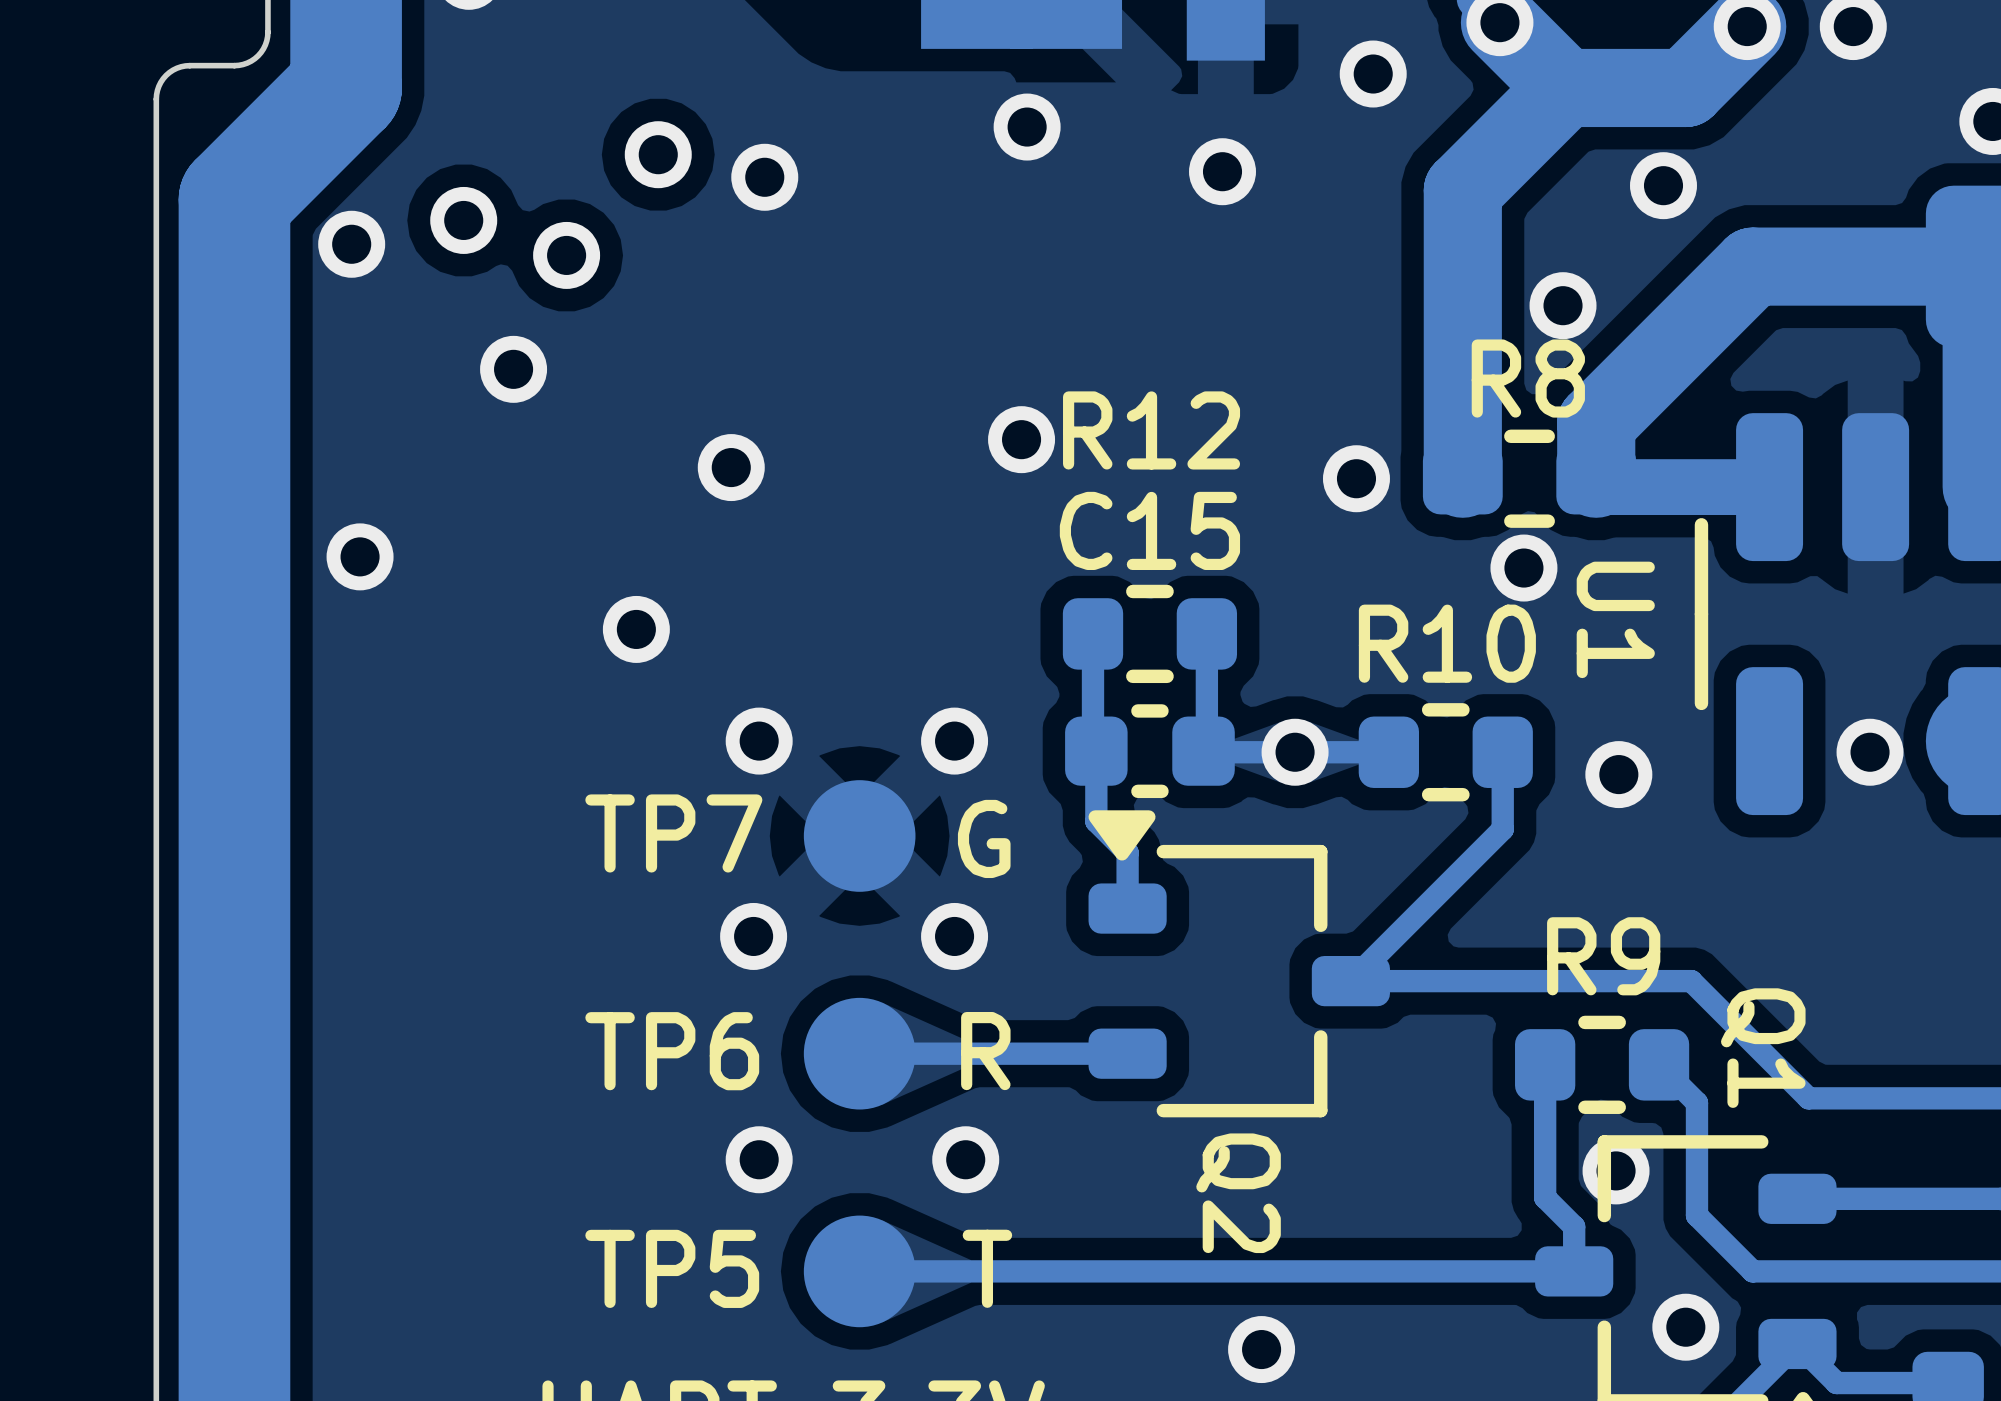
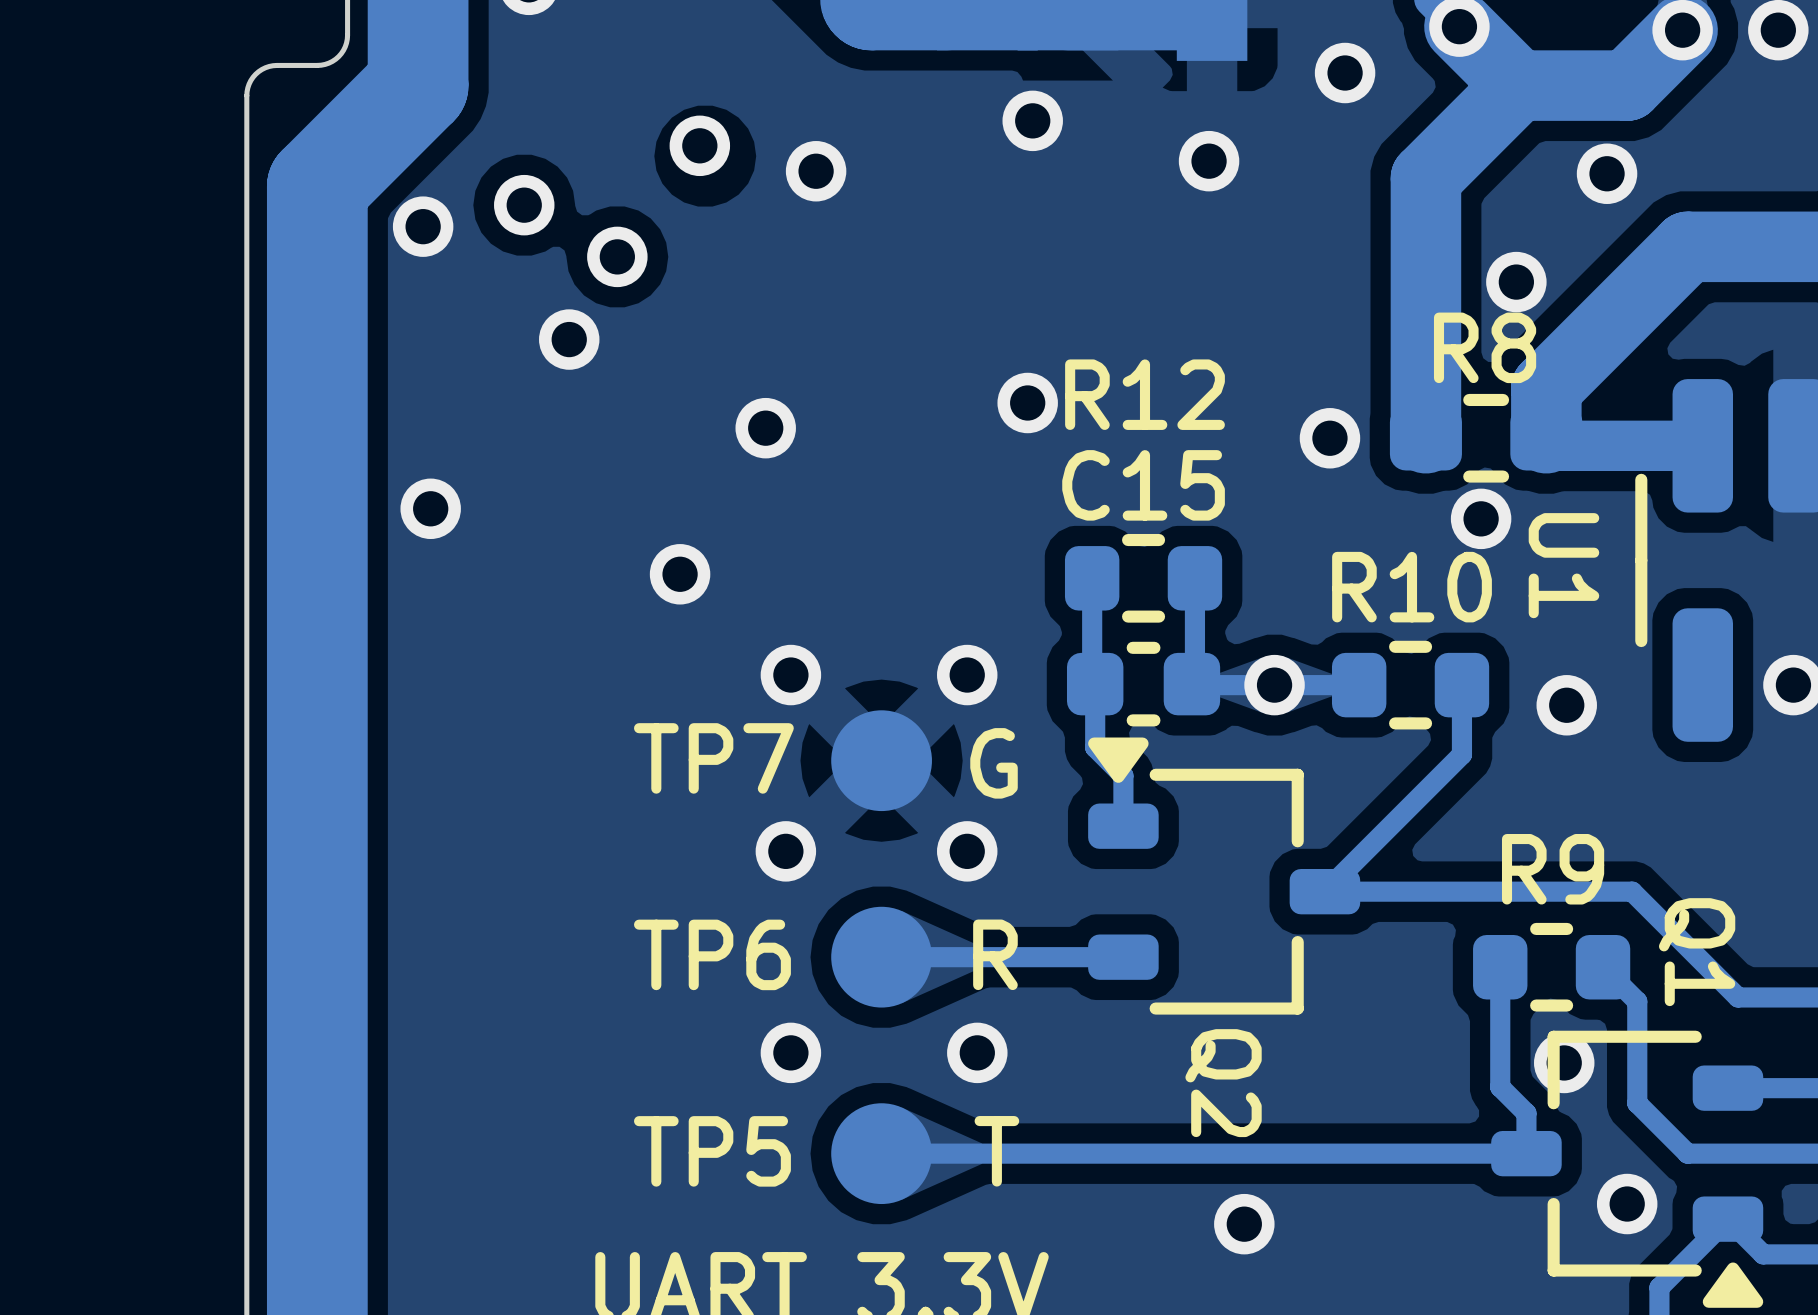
via position: (764, 177) -> (816, 171)
via position: (566, 255) -> (617, 256)

